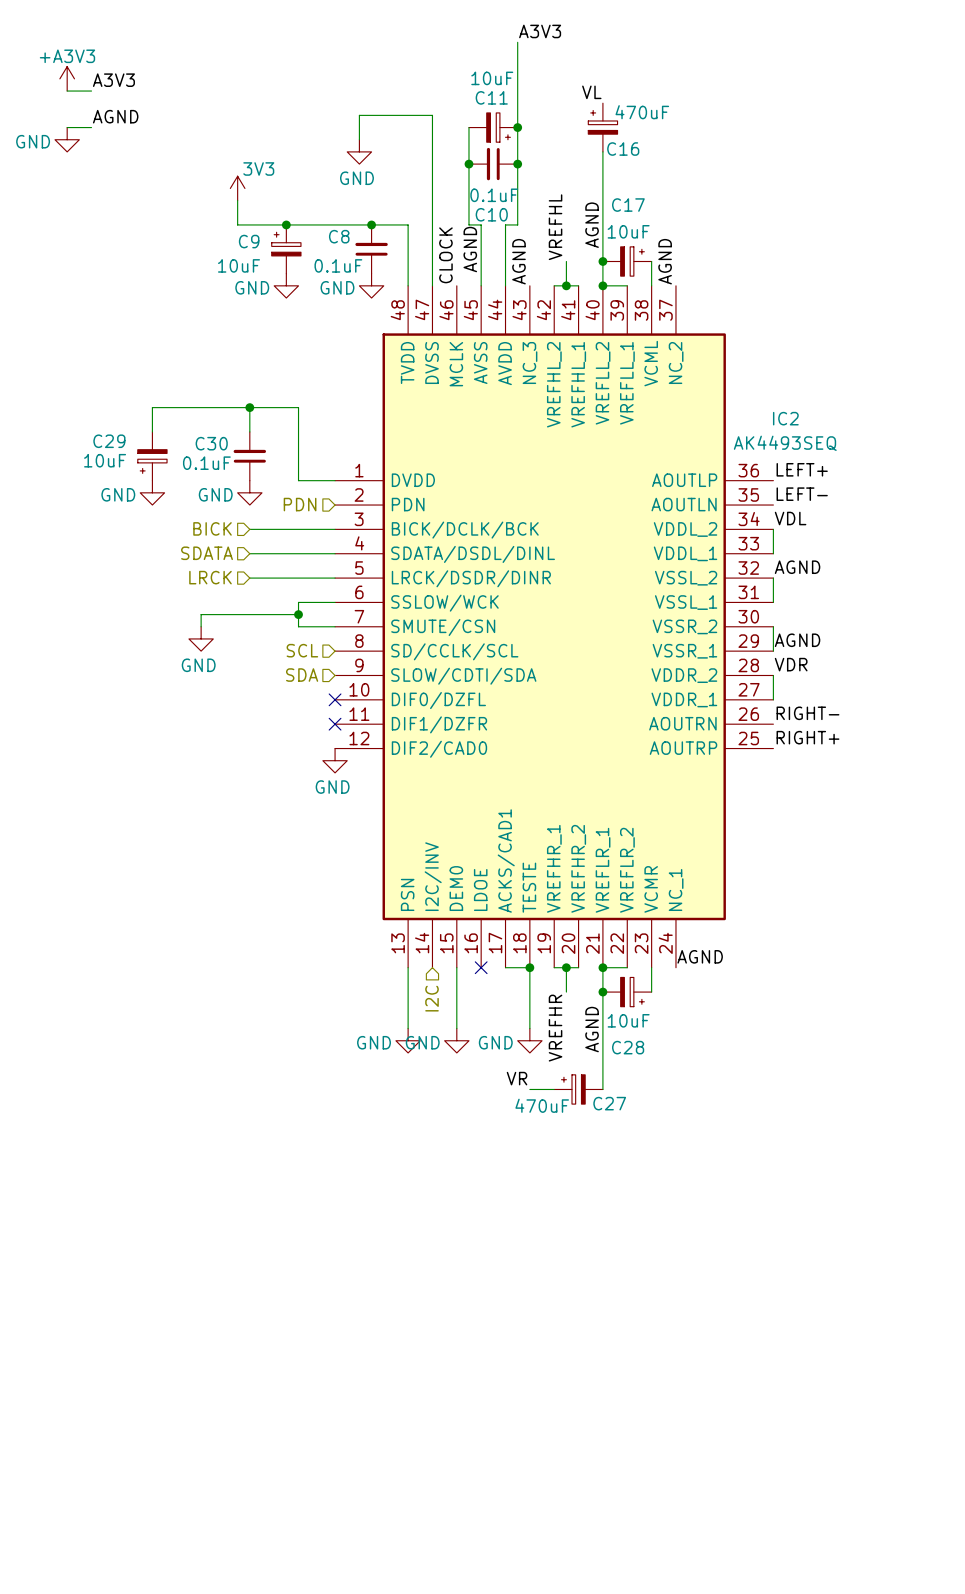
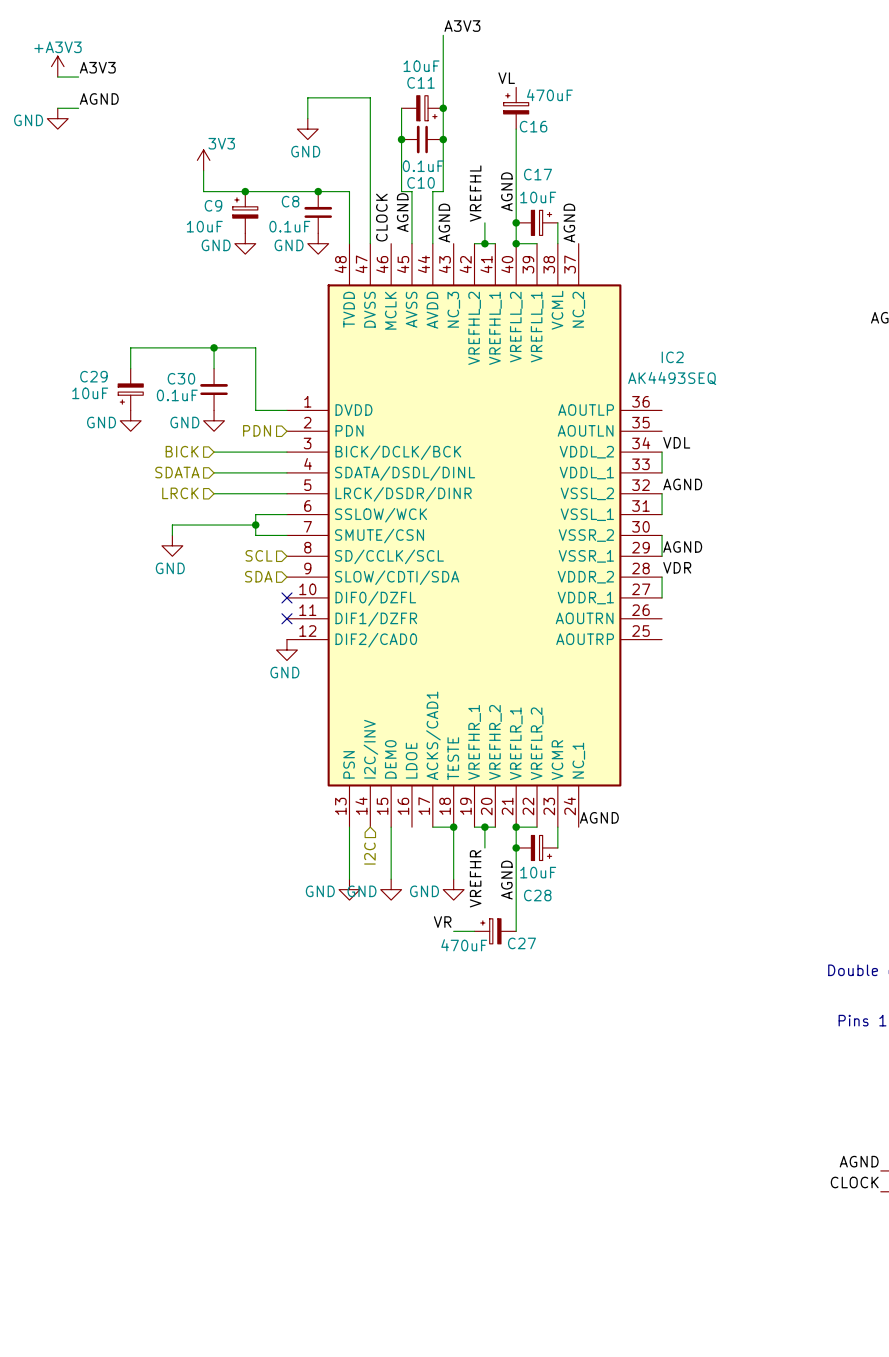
label: LEFT+ (802, 469) -> none
label: LEFT- (802, 494) -> none
label: RIGHT- (807, 713) -> none
label: RIGHT+ (807, 737) -> none
no-connect mark: (481, 967) -> none

